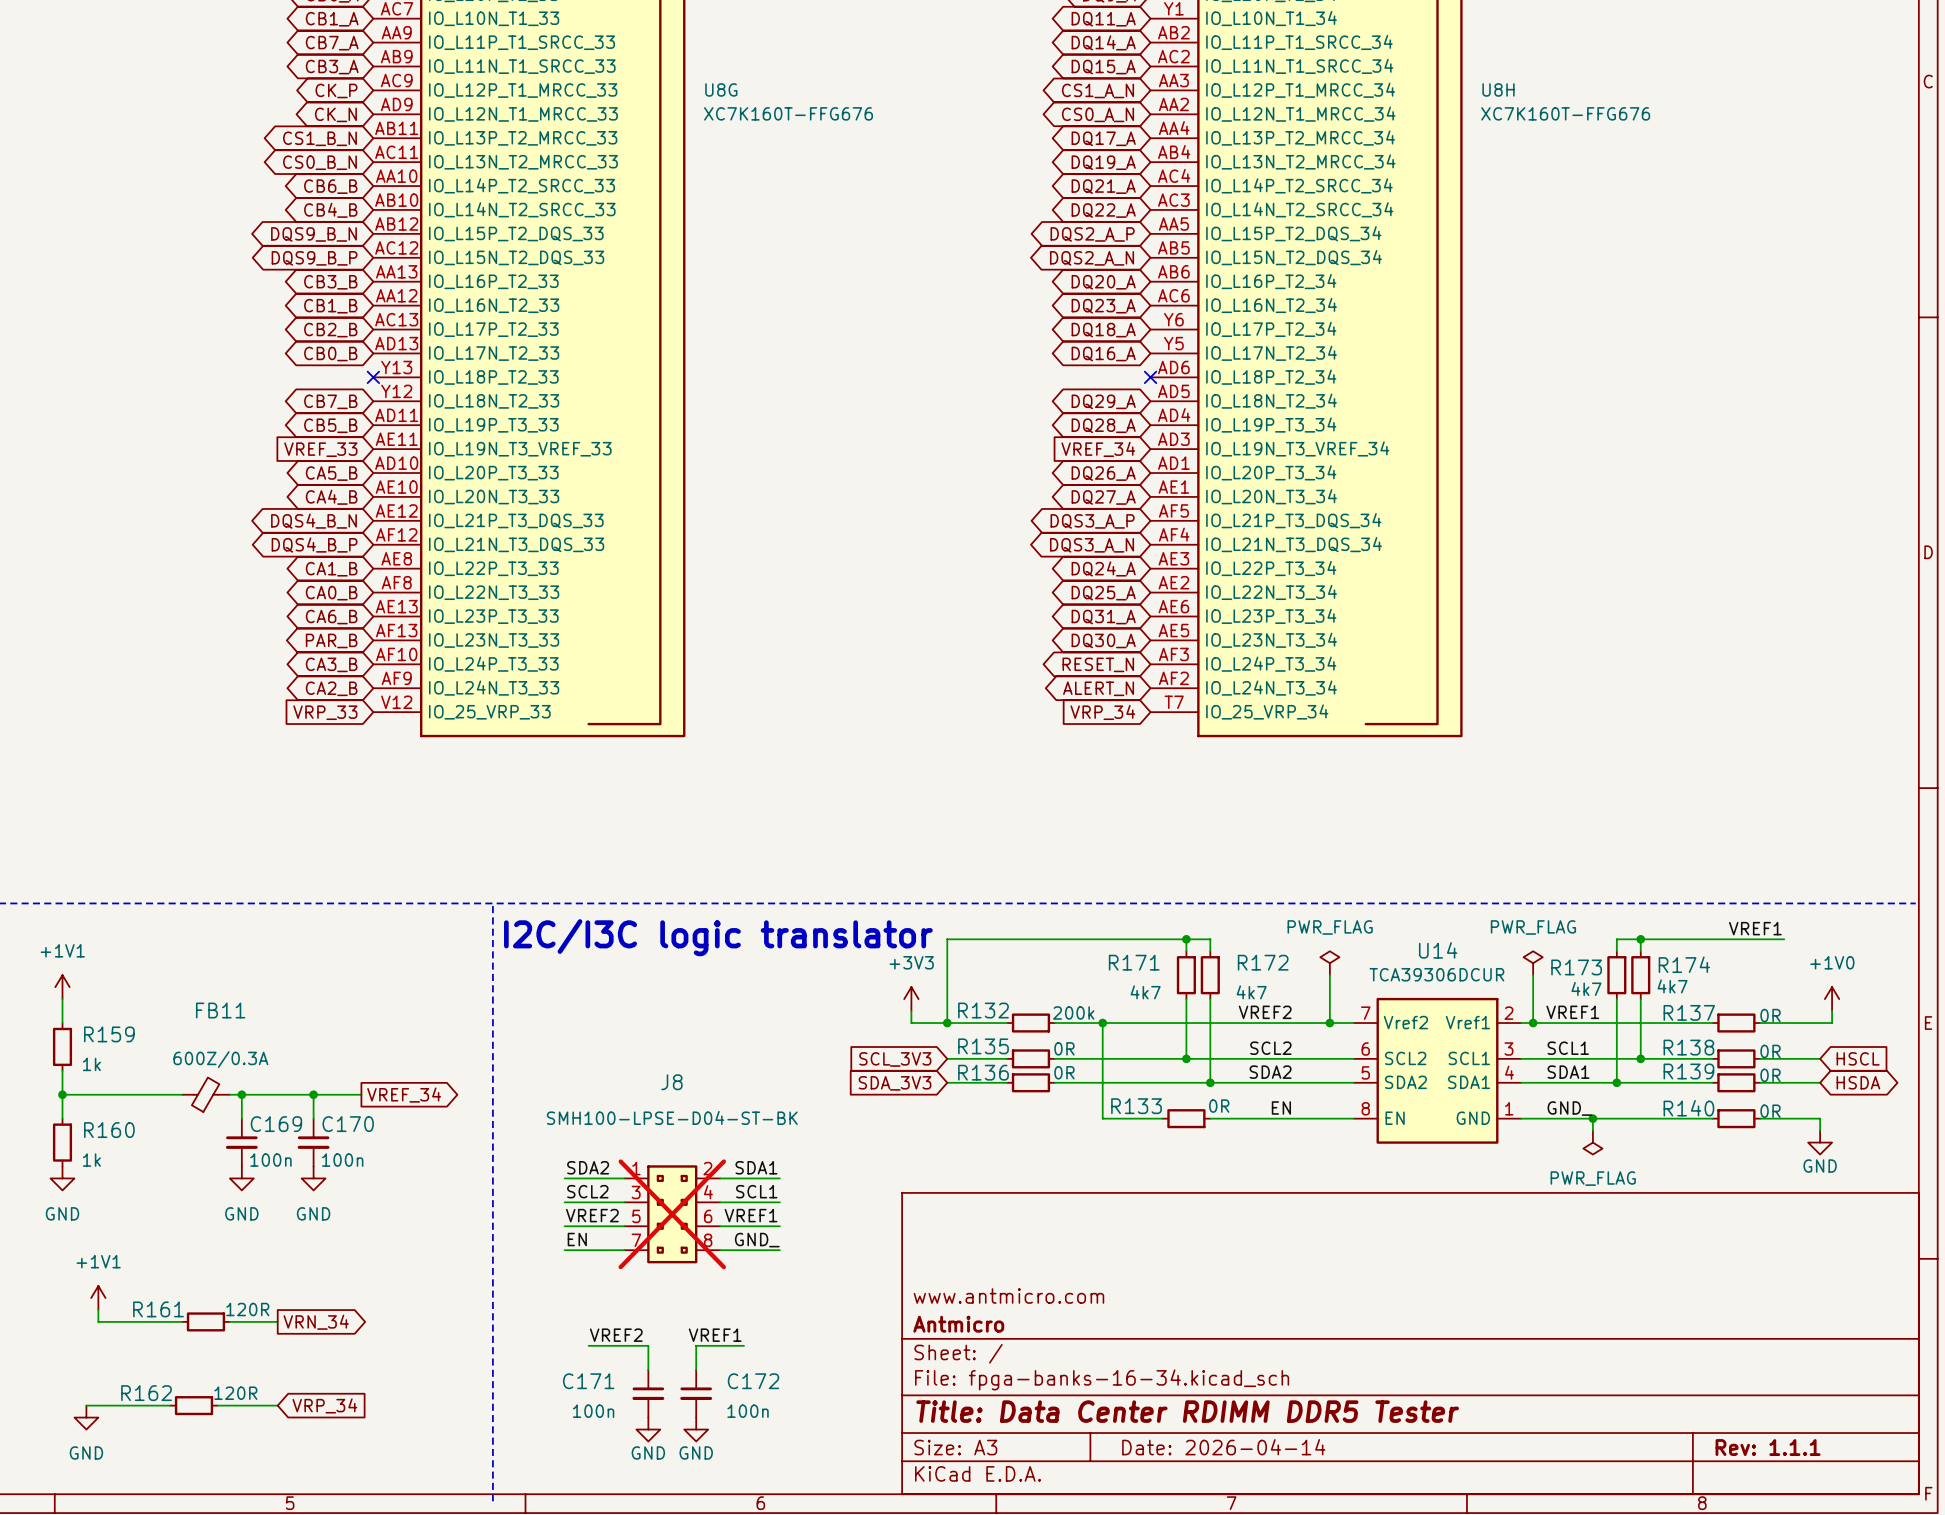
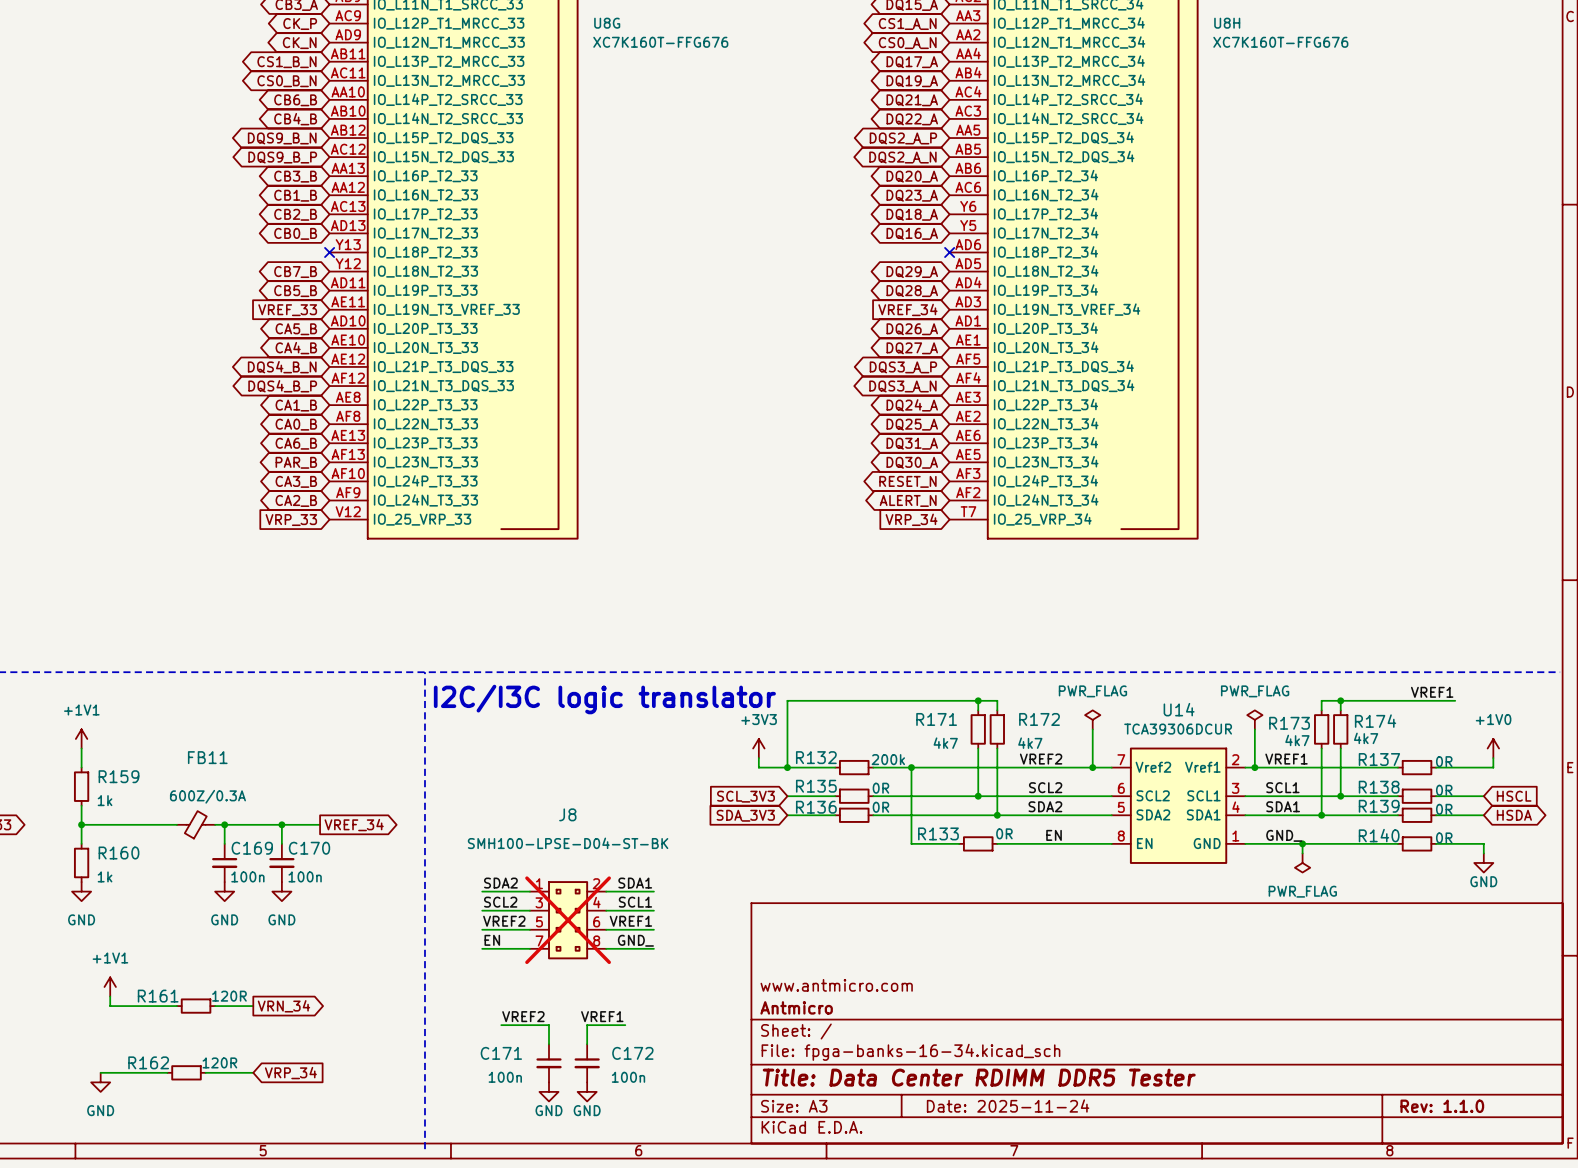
title block: Date: 2026-04-14 (1223, 1447) -> Date: 2025-11-24 (1008, 1106)
title block: Rev: 1.1.1 (1768, 1447) -> Rev: 1.1.0 (1442, 1106)

